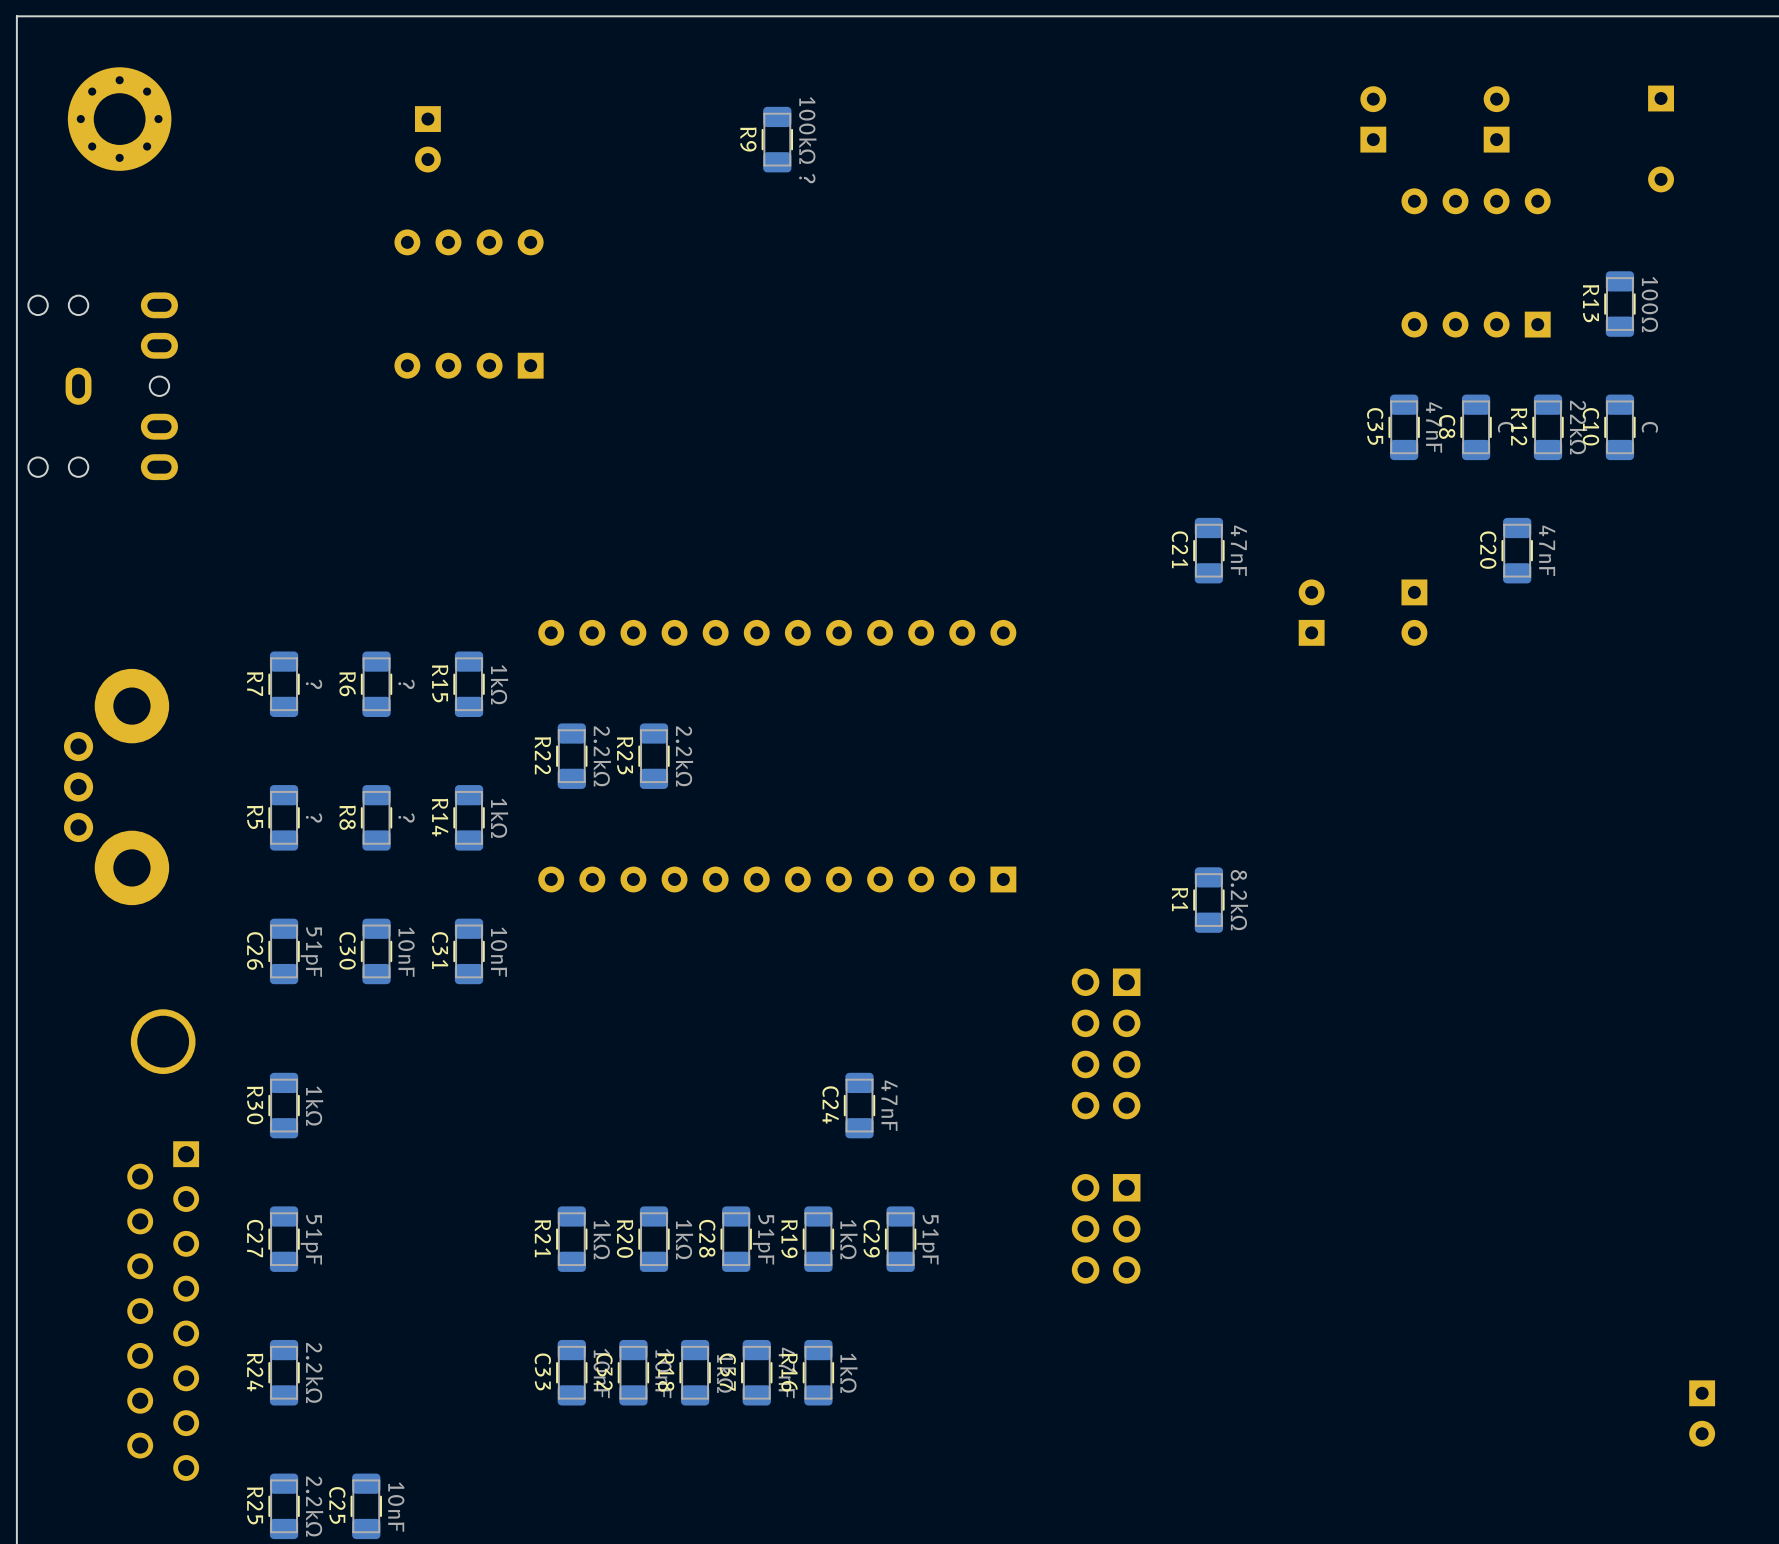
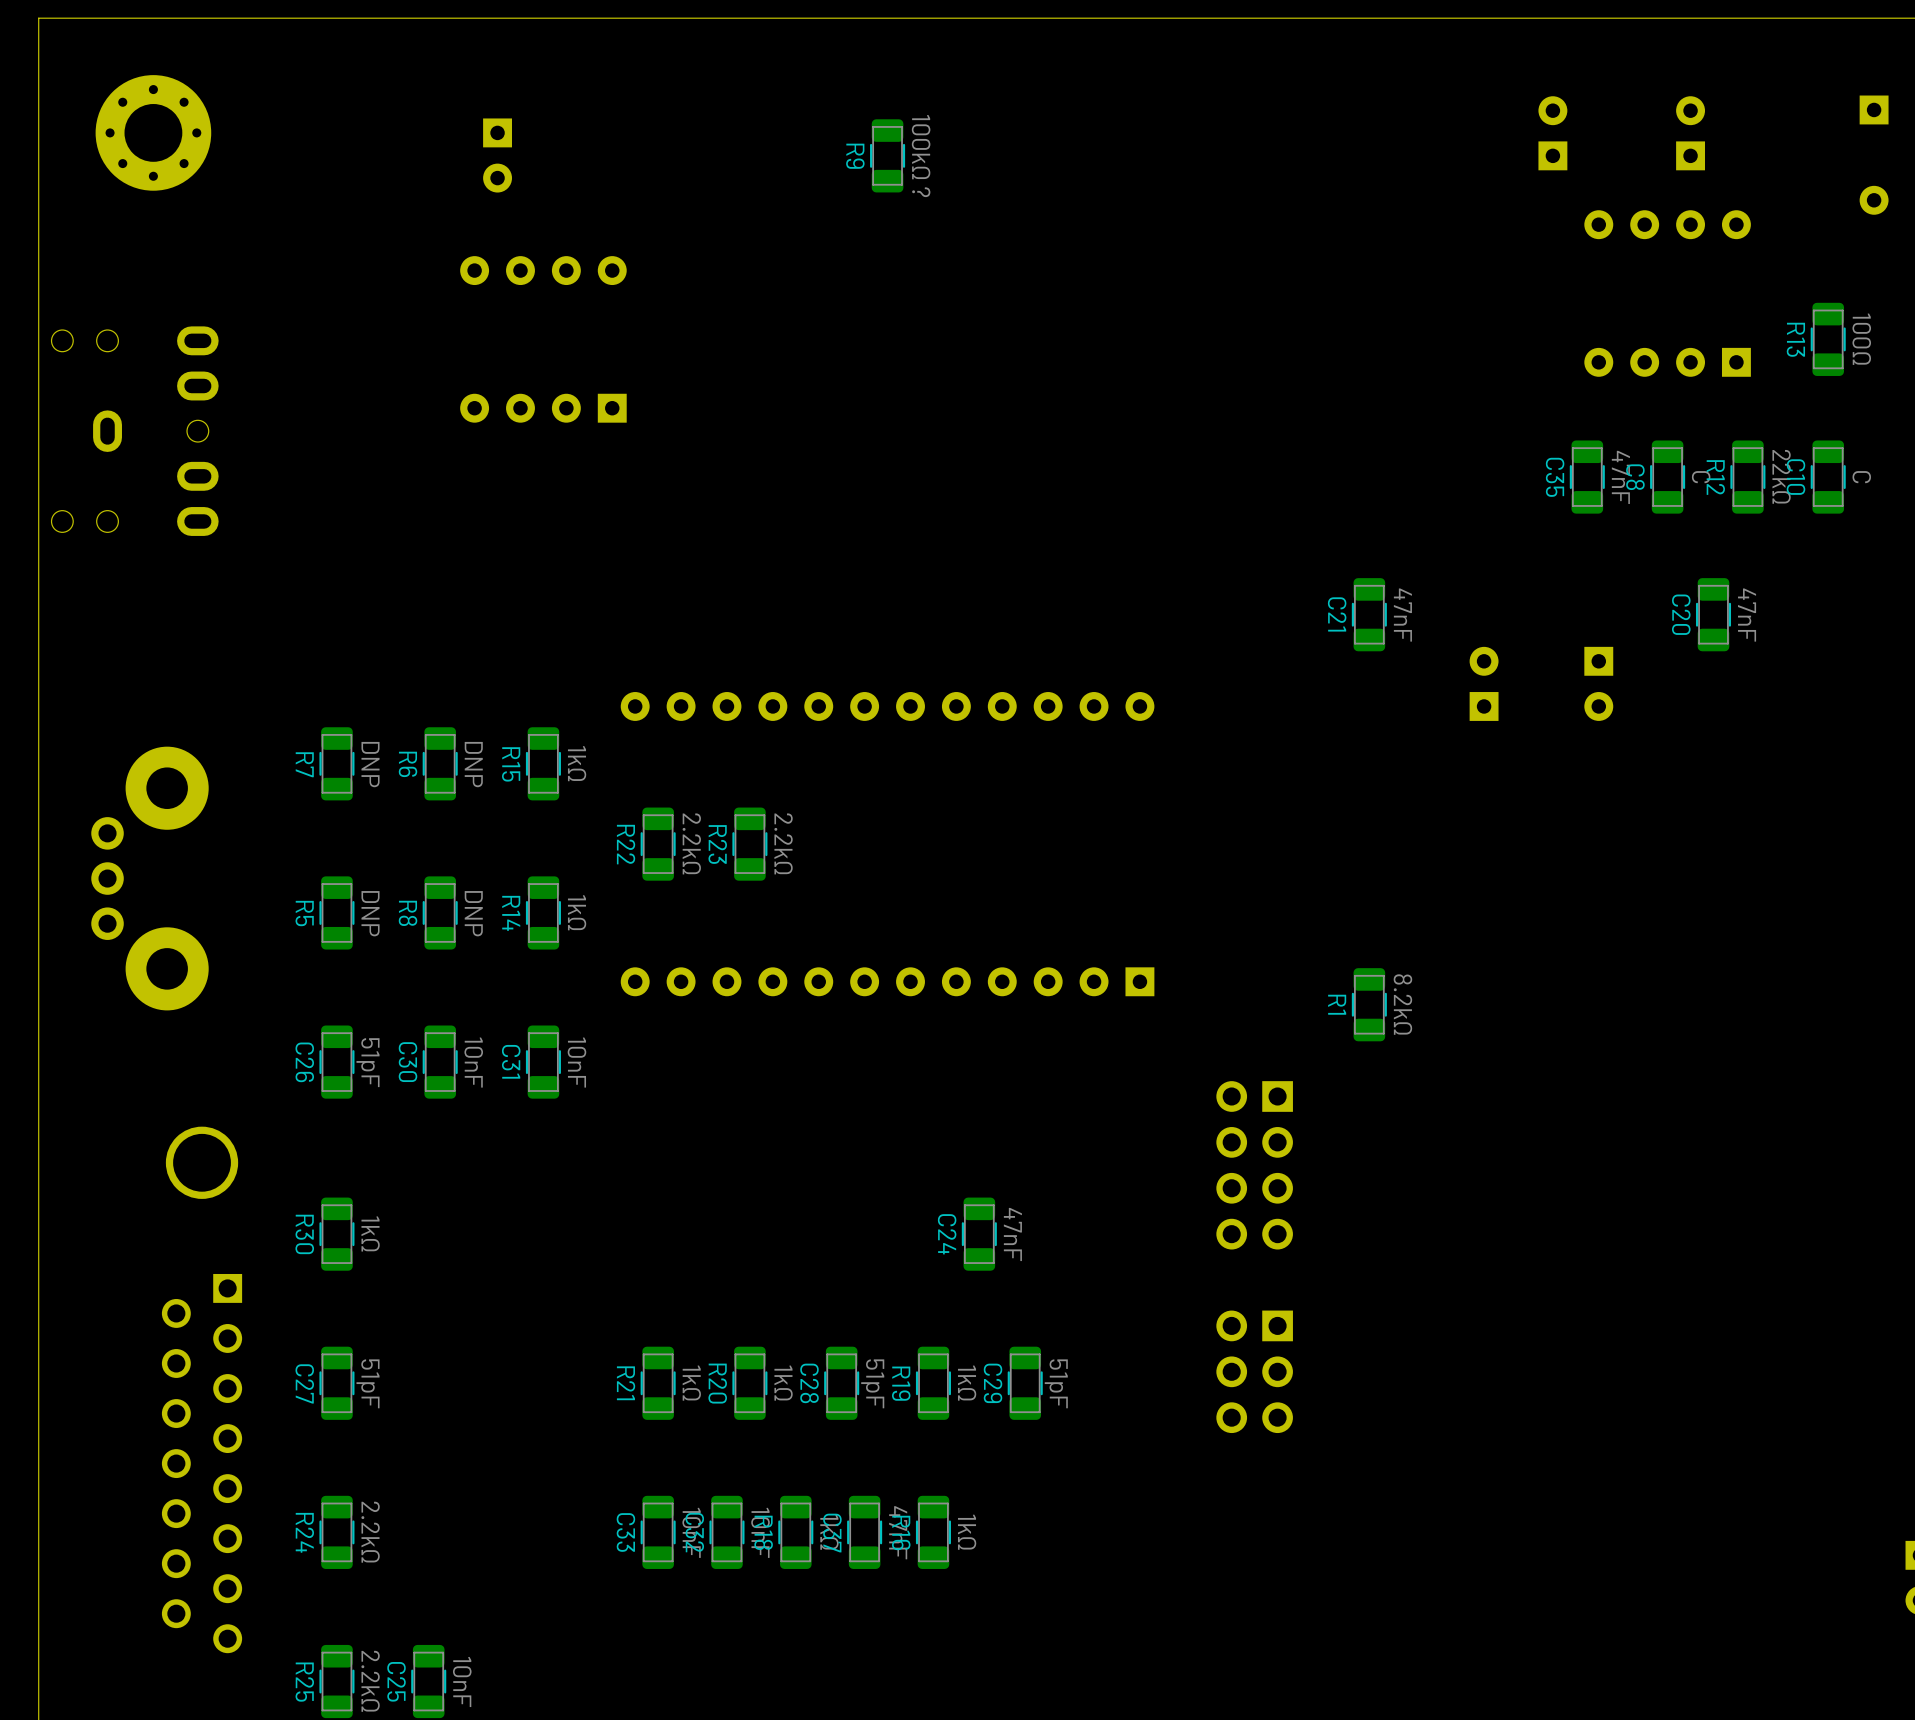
R7 value: ? (314, 684) -> DNP (370, 764)
R6 value: ? (406, 684) -> DNP (473, 764)
R5 value: ? (314, 817) -> DNP (370, 913)
R8 value: ? (406, 817) -> DNP (473, 913)

